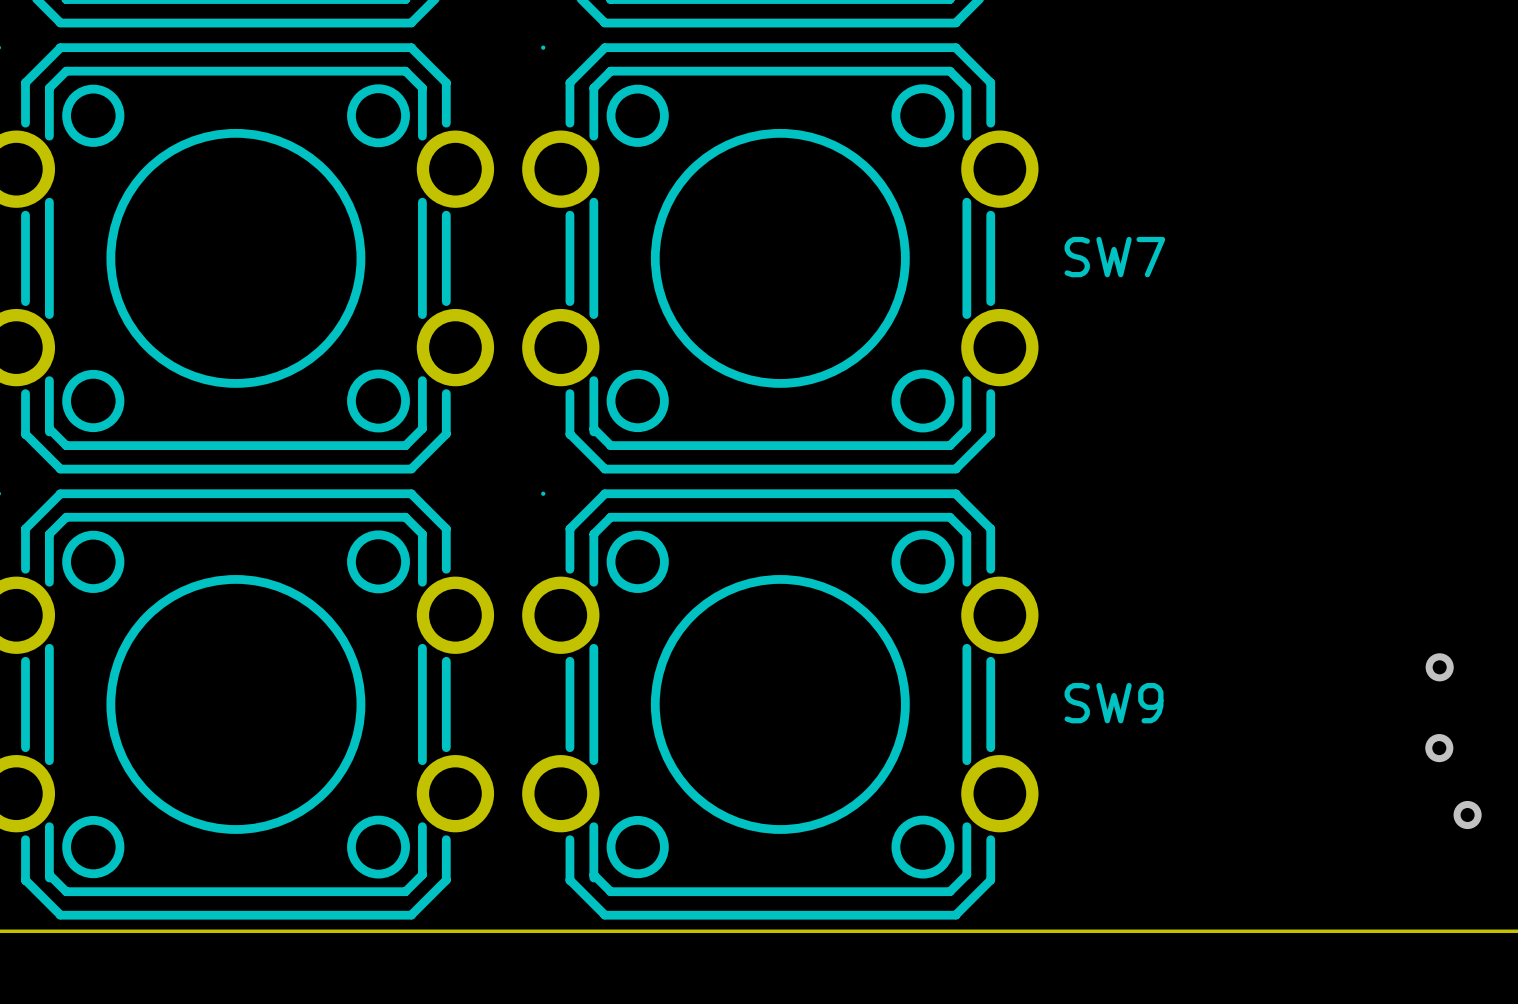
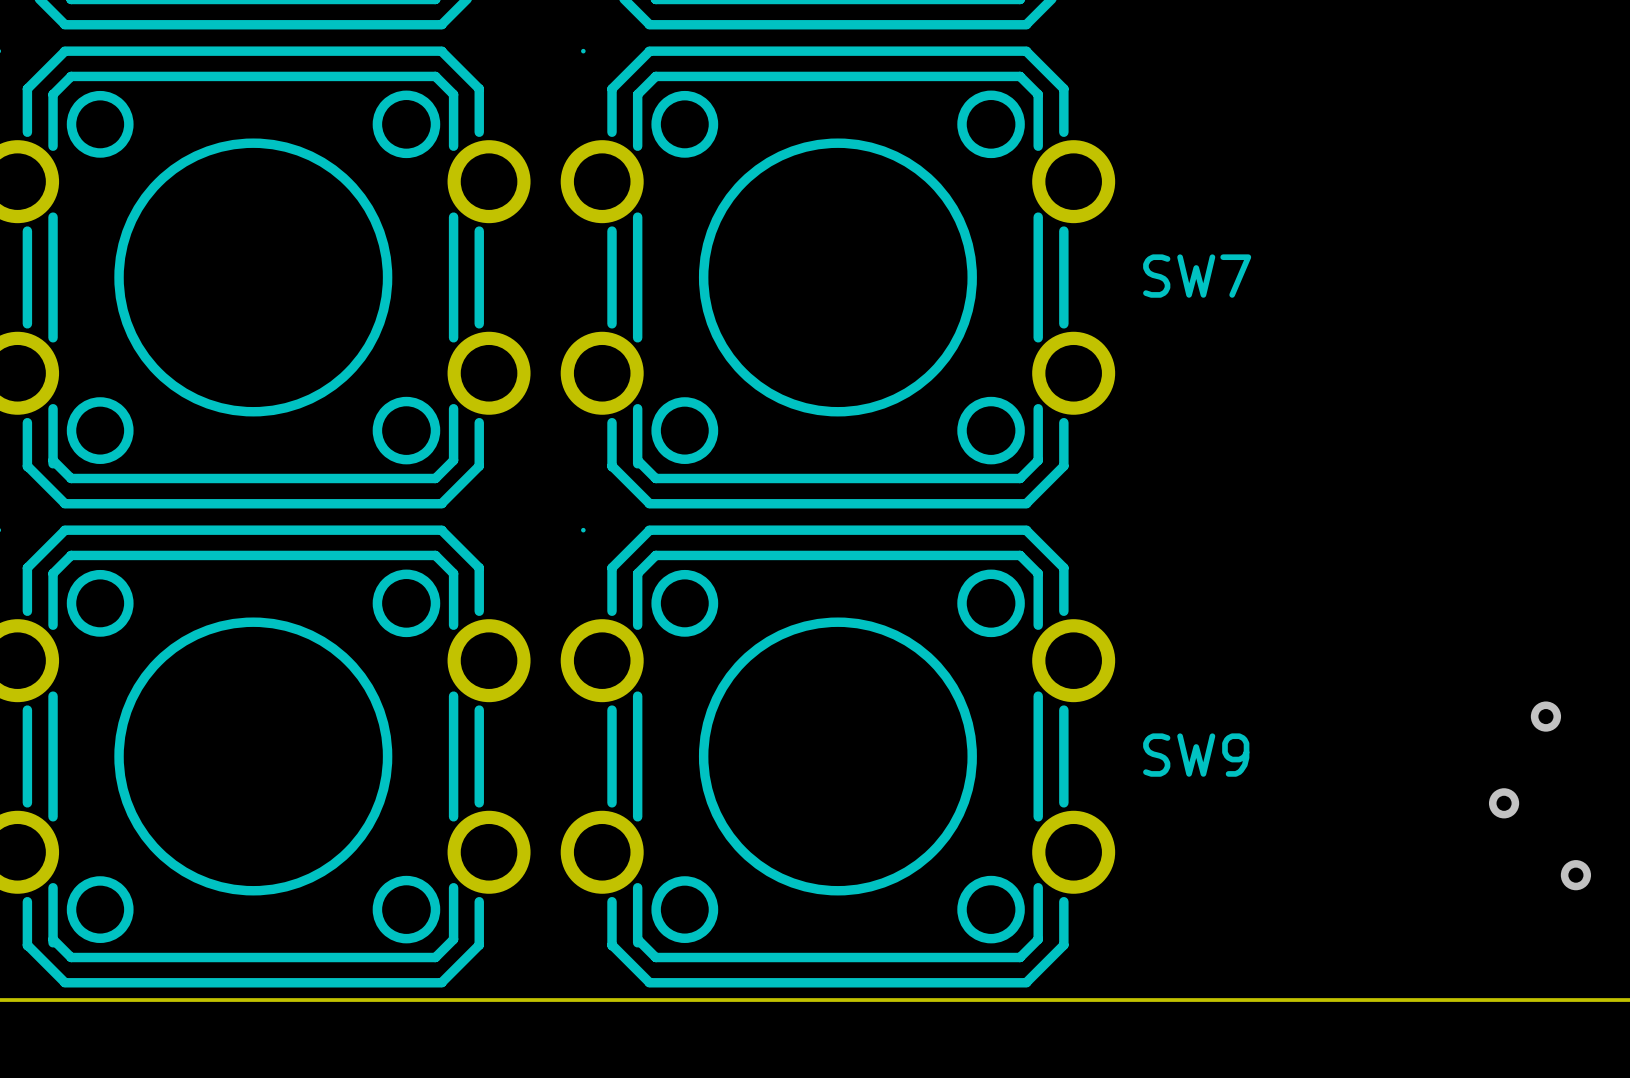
via position: (1439, 748) -> (1504, 803)

